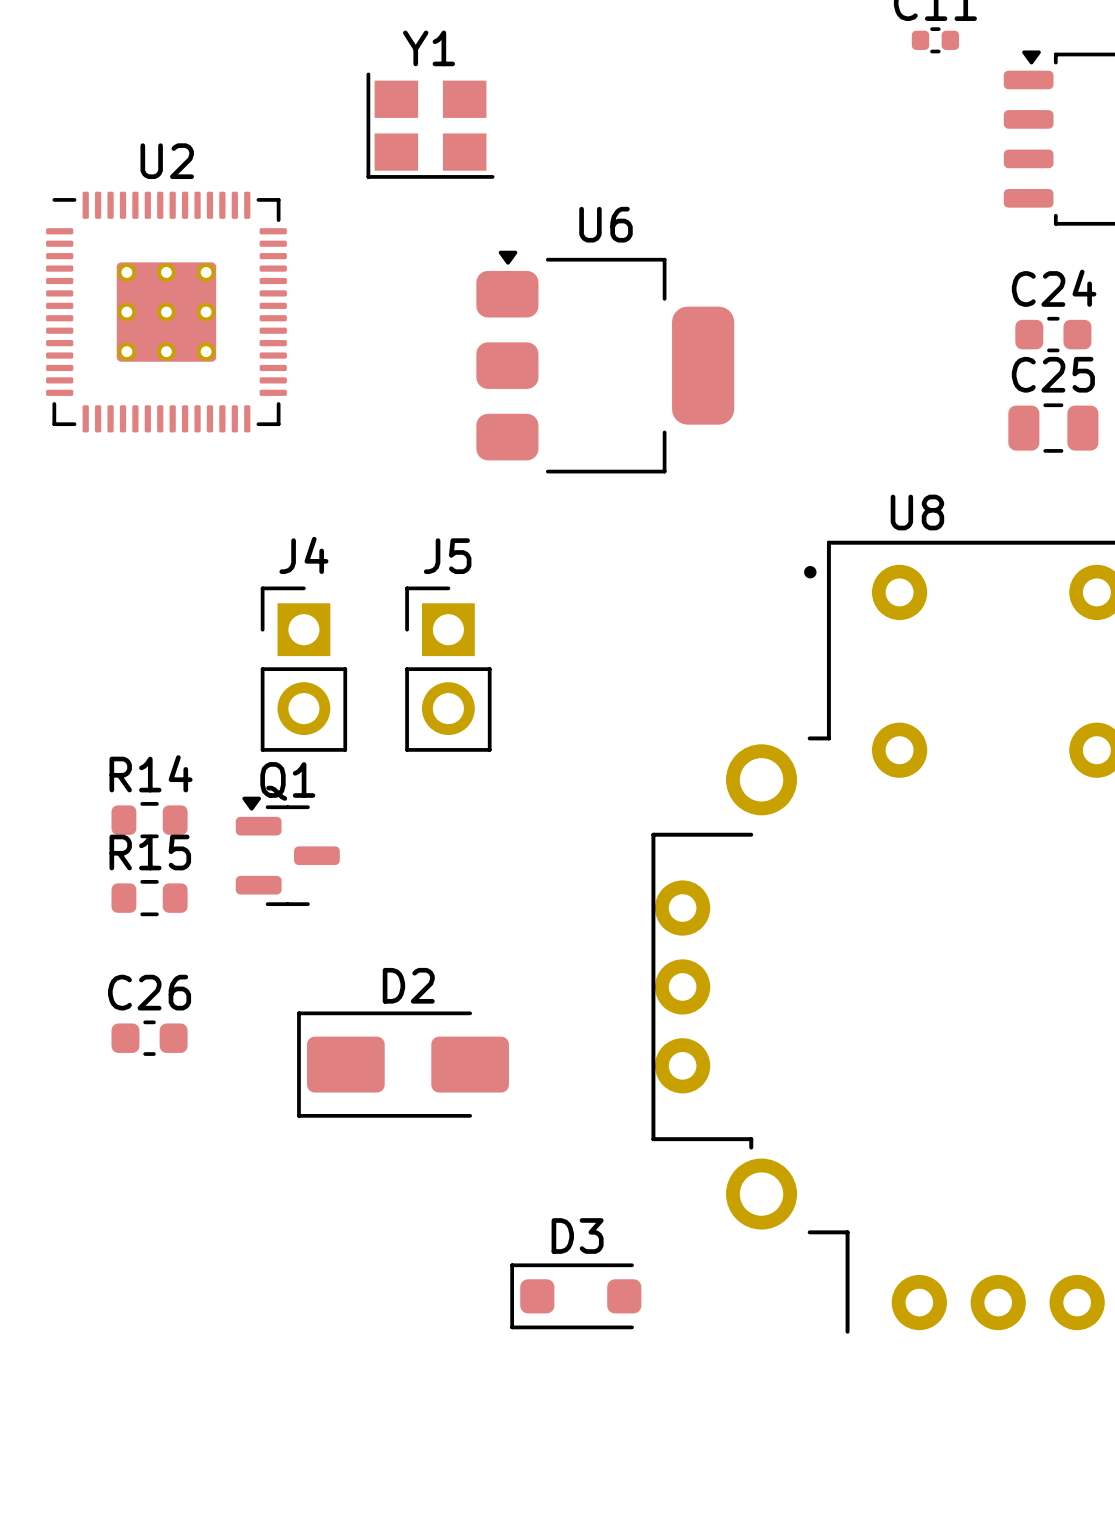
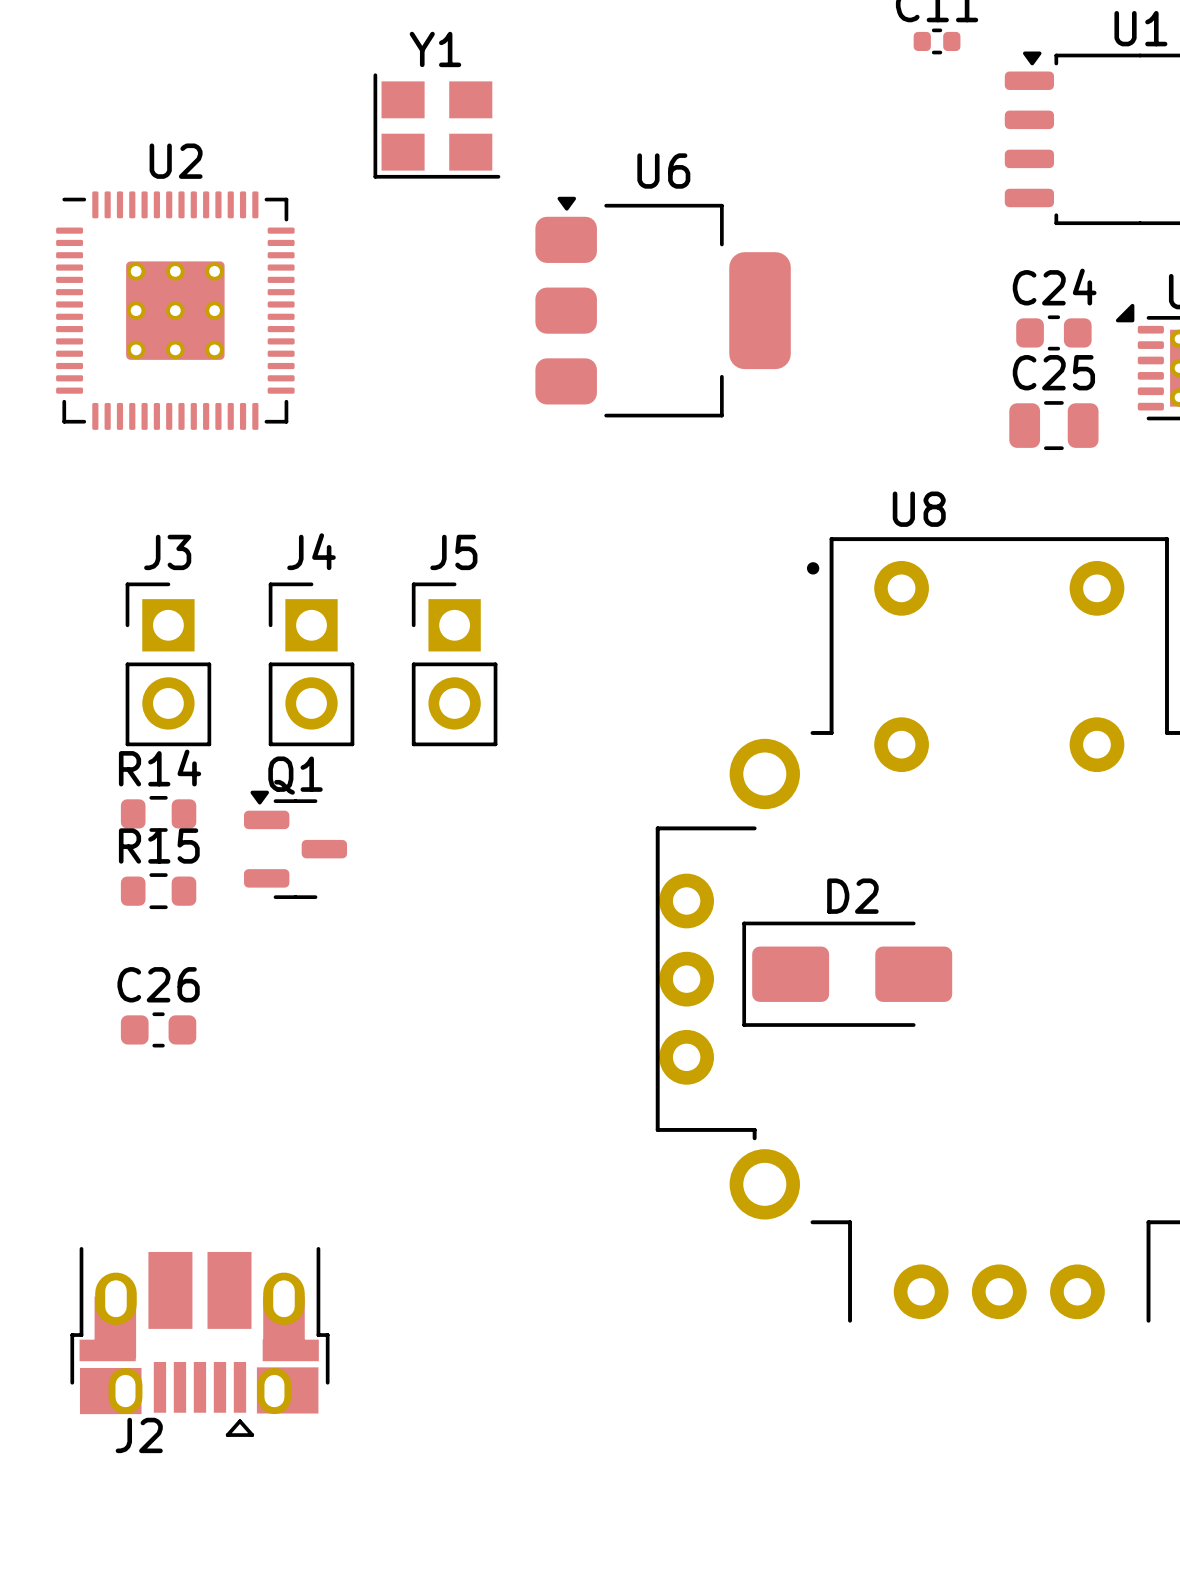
U6 position: (605, 362) -> (663, 307)
J3: none -> (168, 664)
D2 position: (403, 1064) -> (847, 974)
D3: (575, 1296) -> none
J2: none -> (199, 1341)

